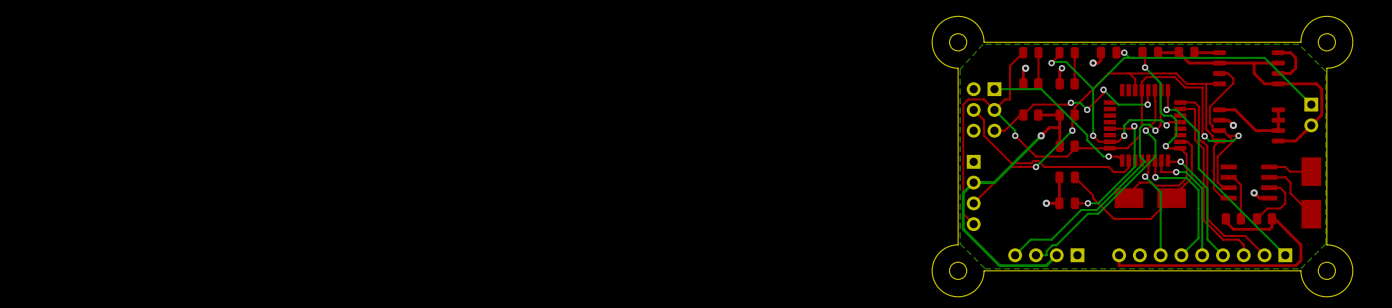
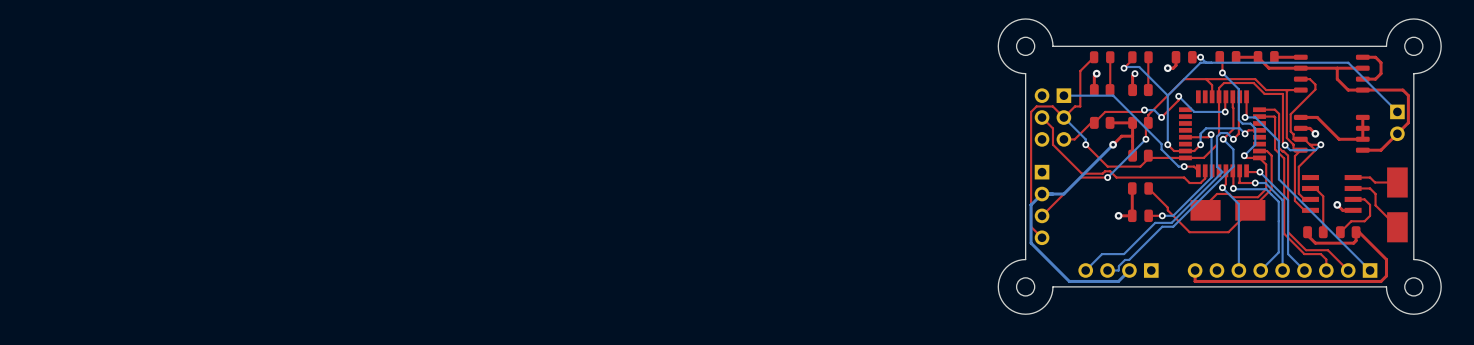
bottom zone outline: (1298, 44) (1325, 71) (1325, 243) (1300, 268) (985, 268) (960, 243) (960, 69) (983, 44) (1298, 44) -> none

